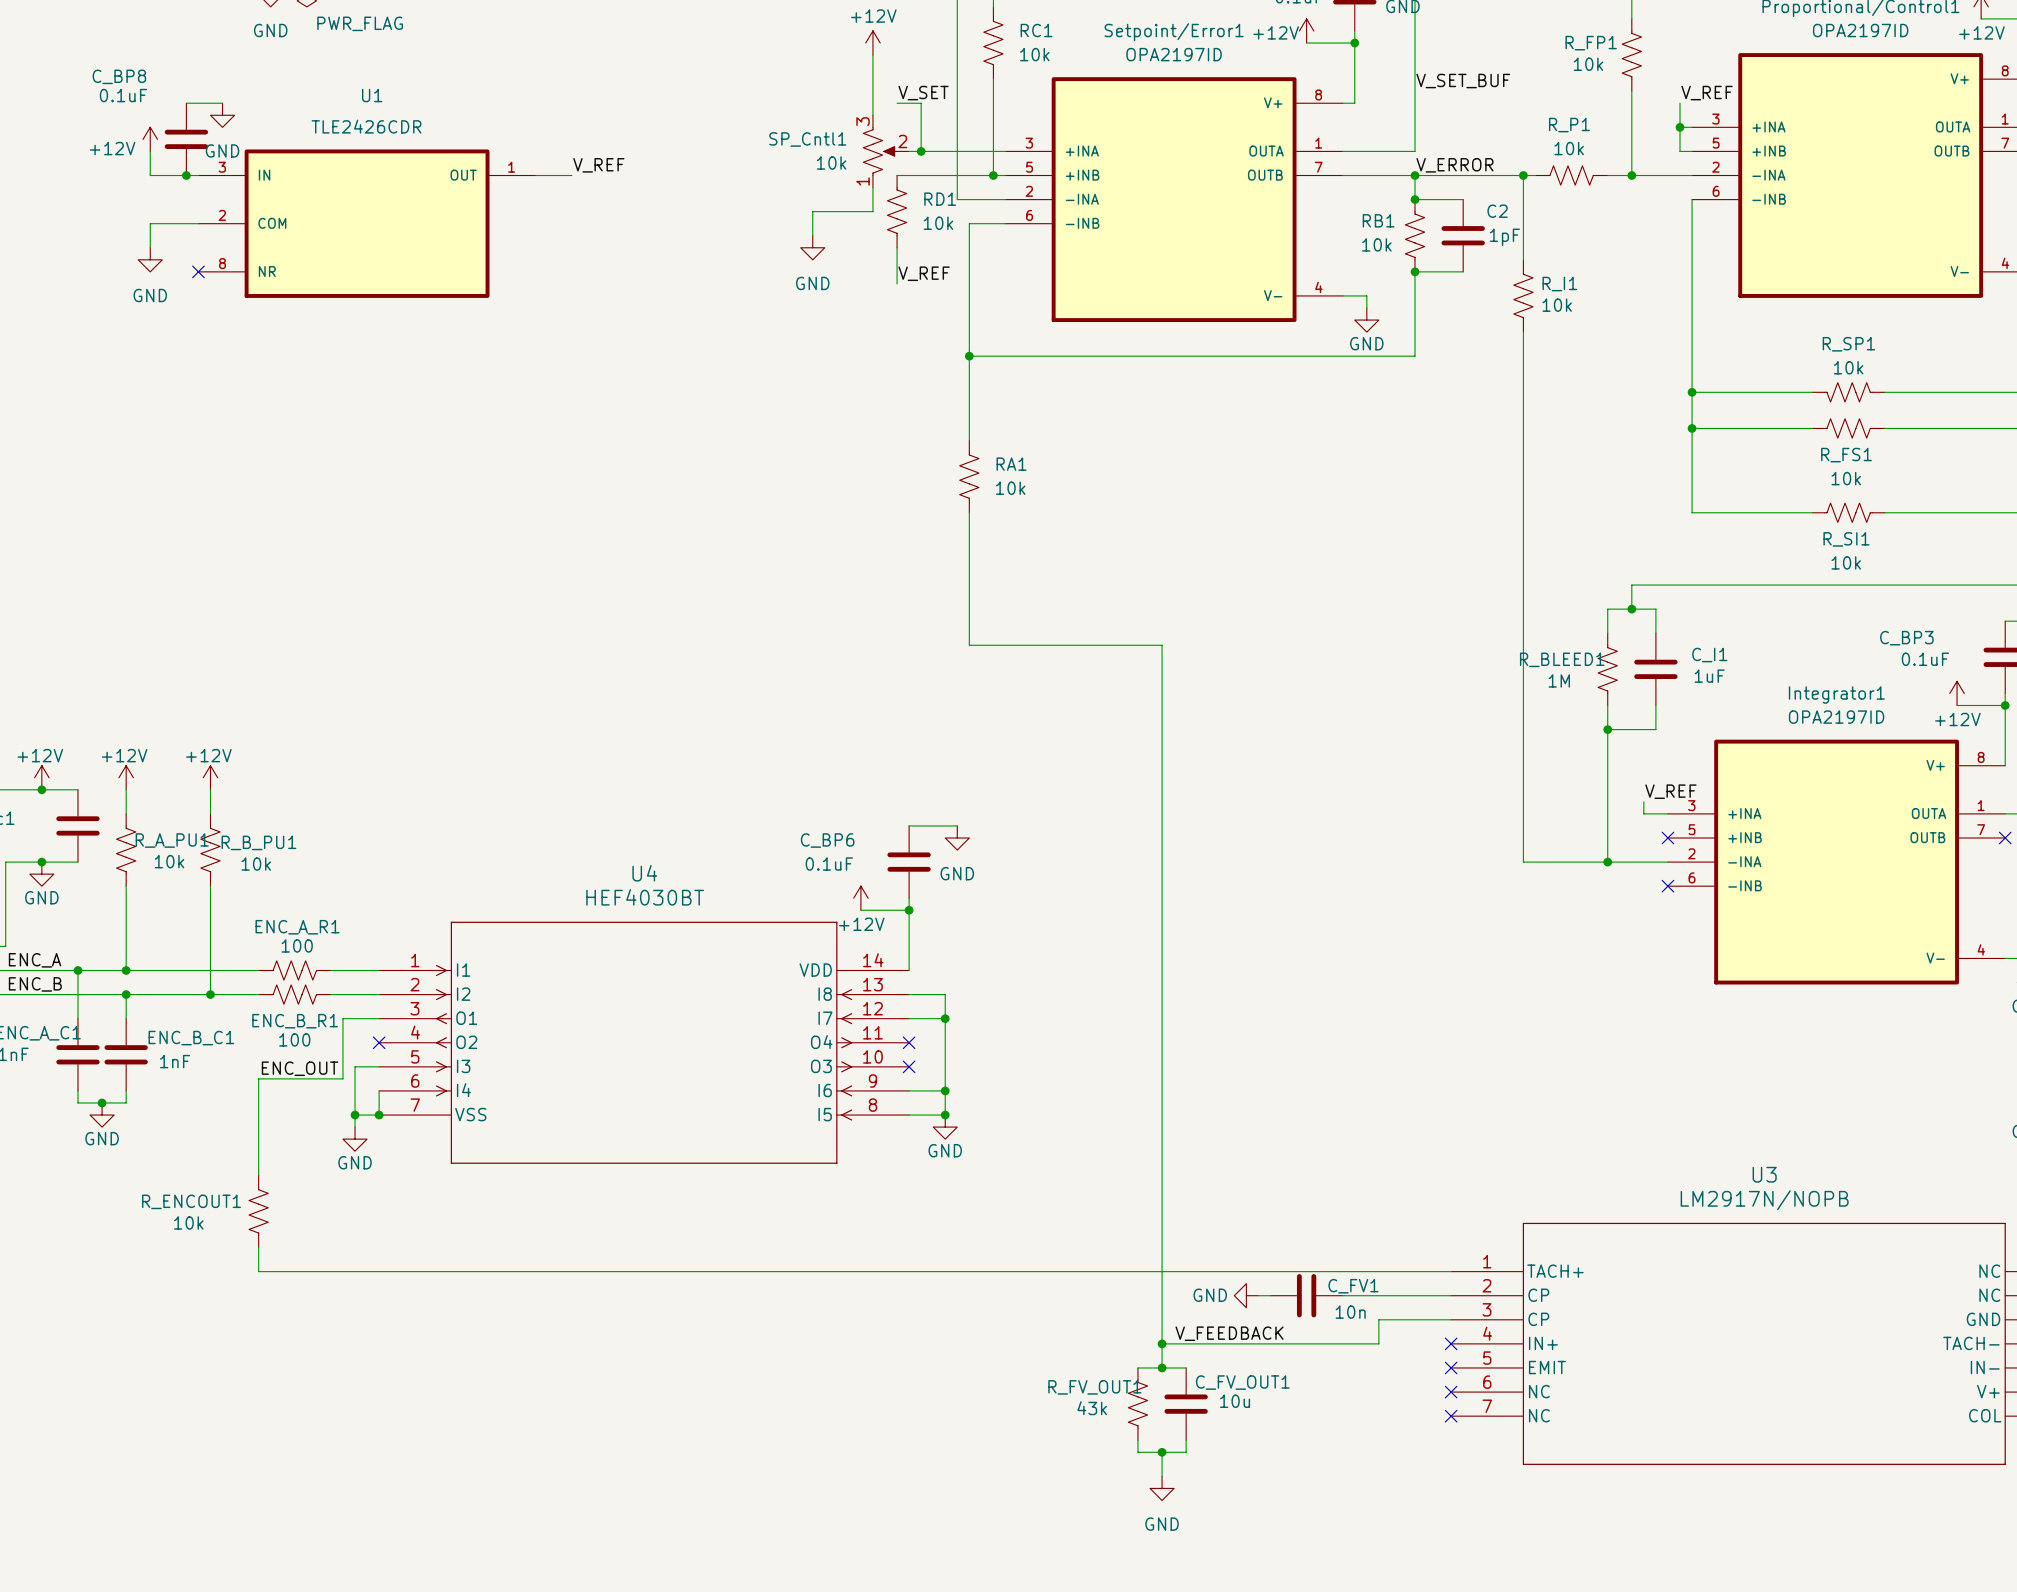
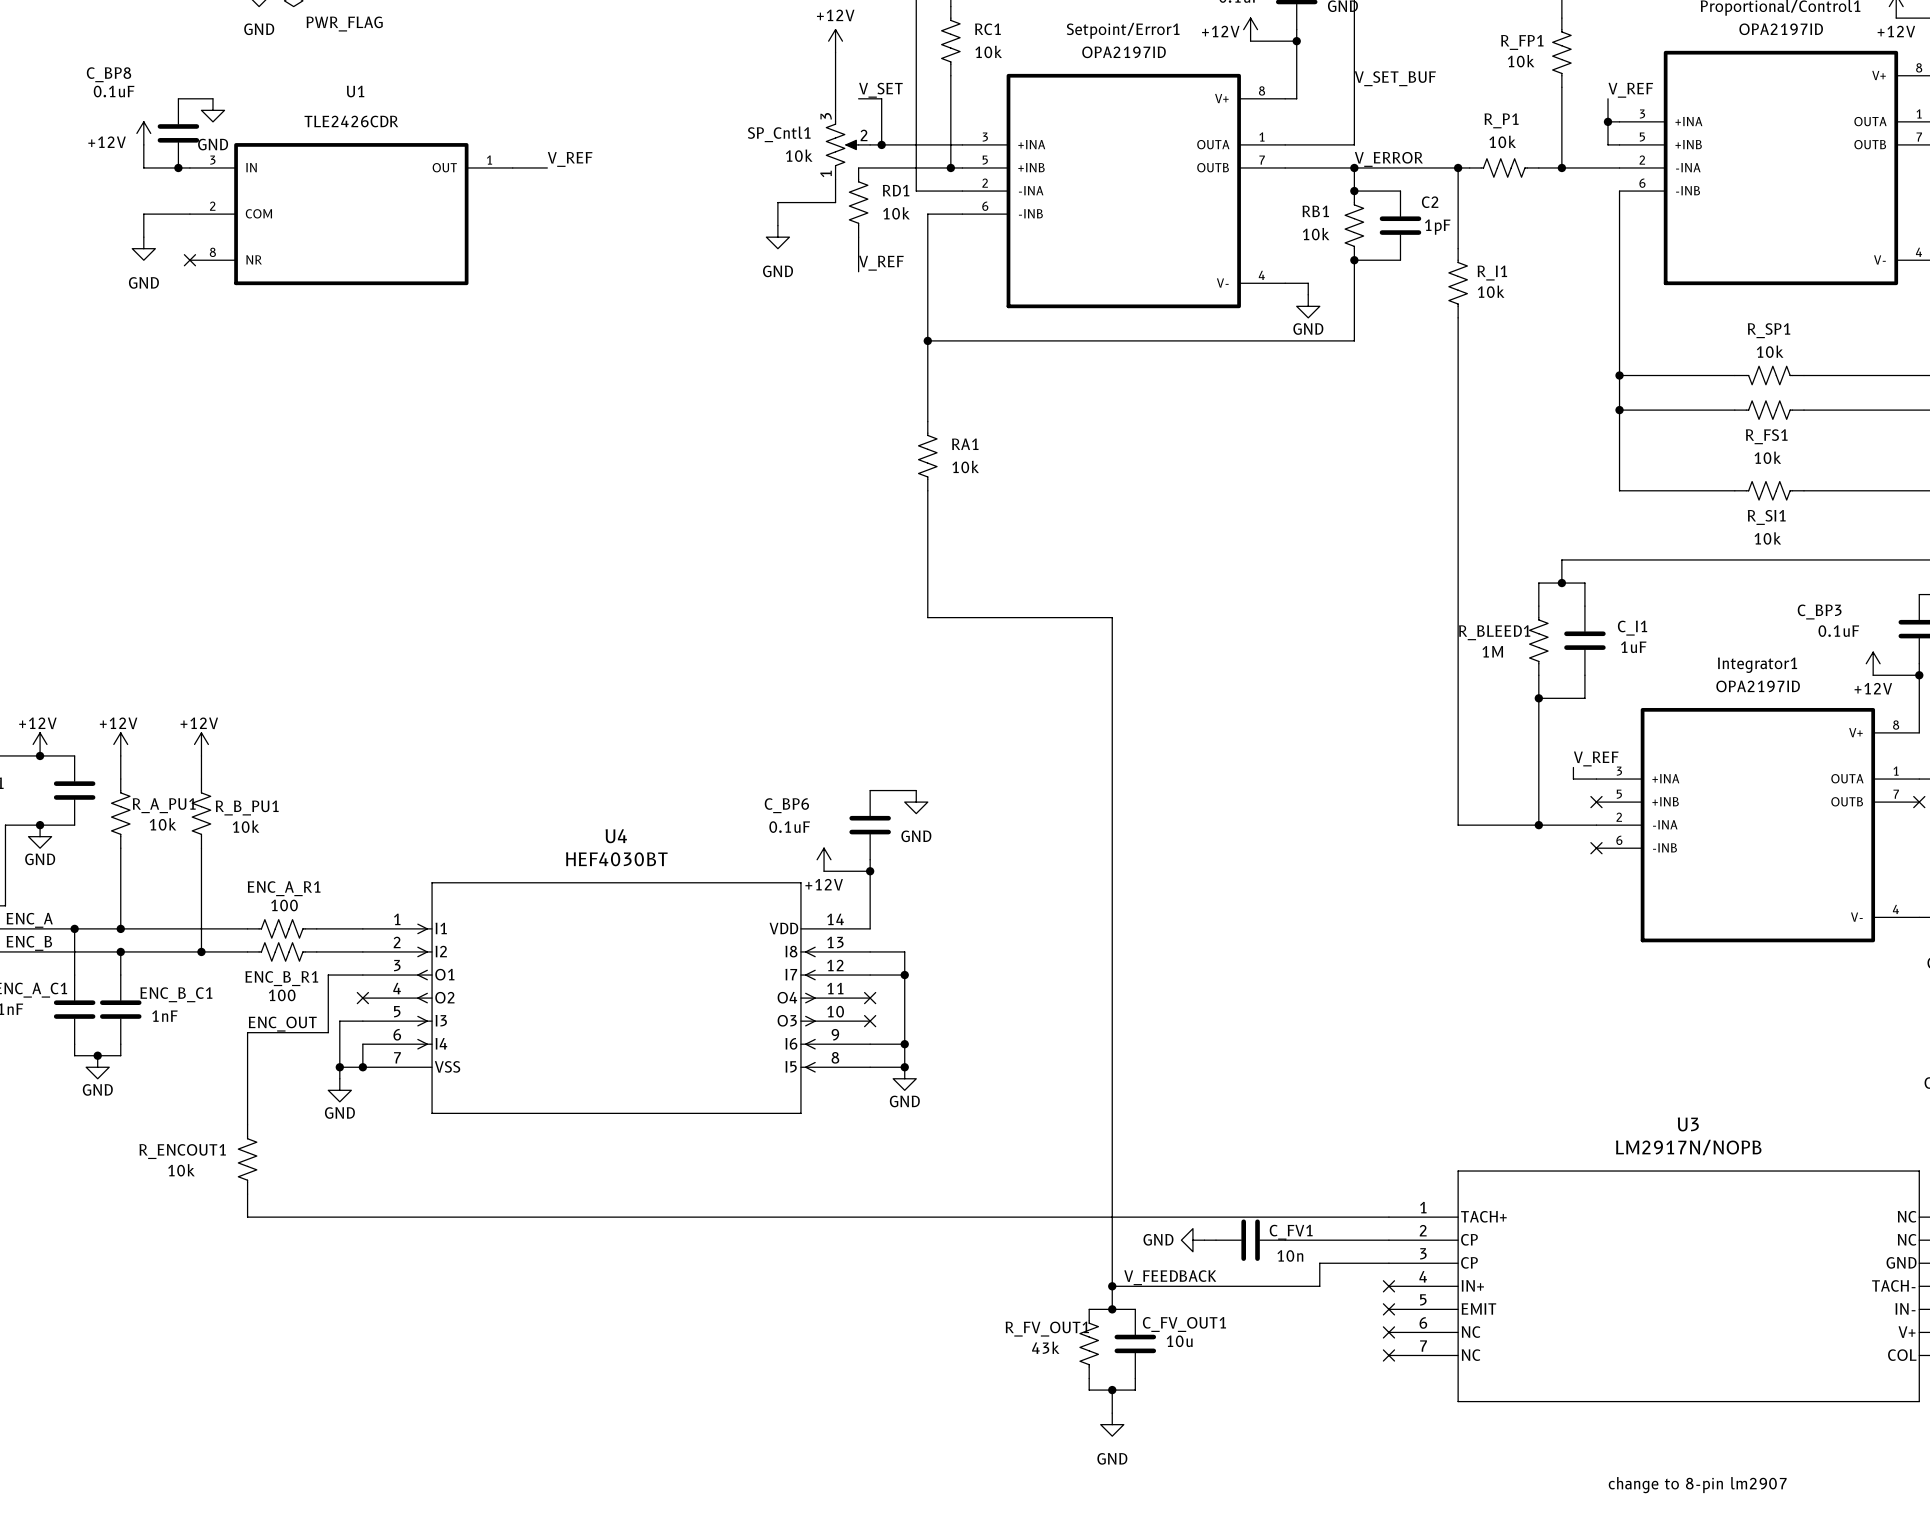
label: none -> change to 8-pin lm2907 (1697, 1485)

